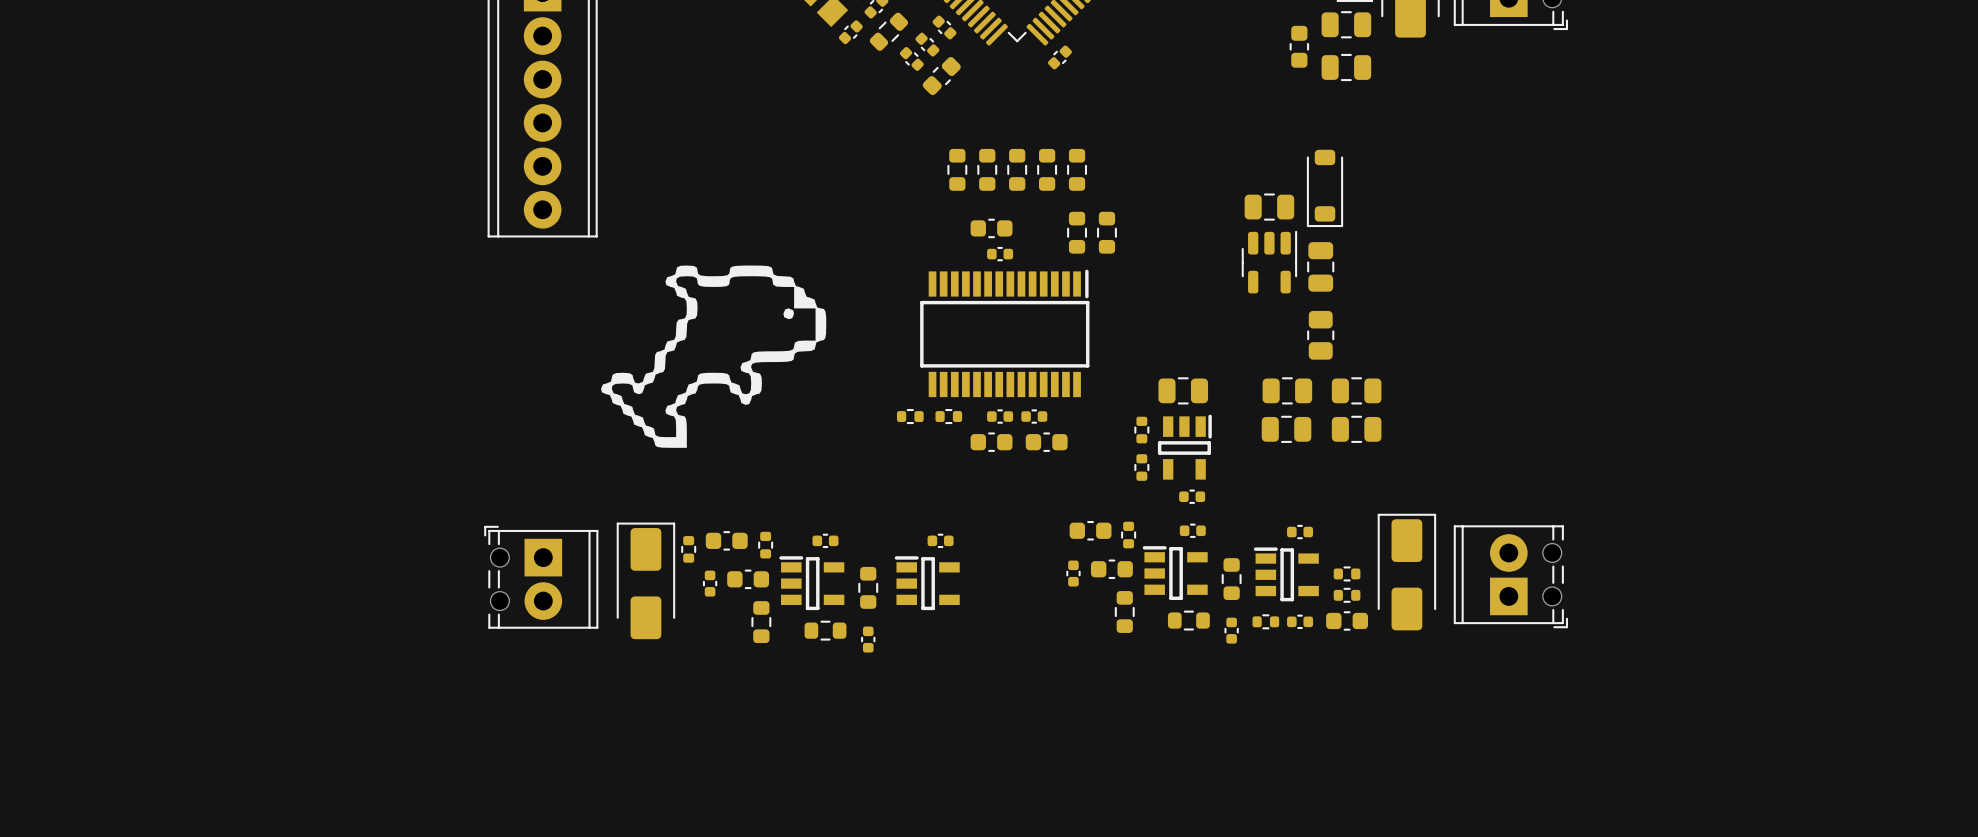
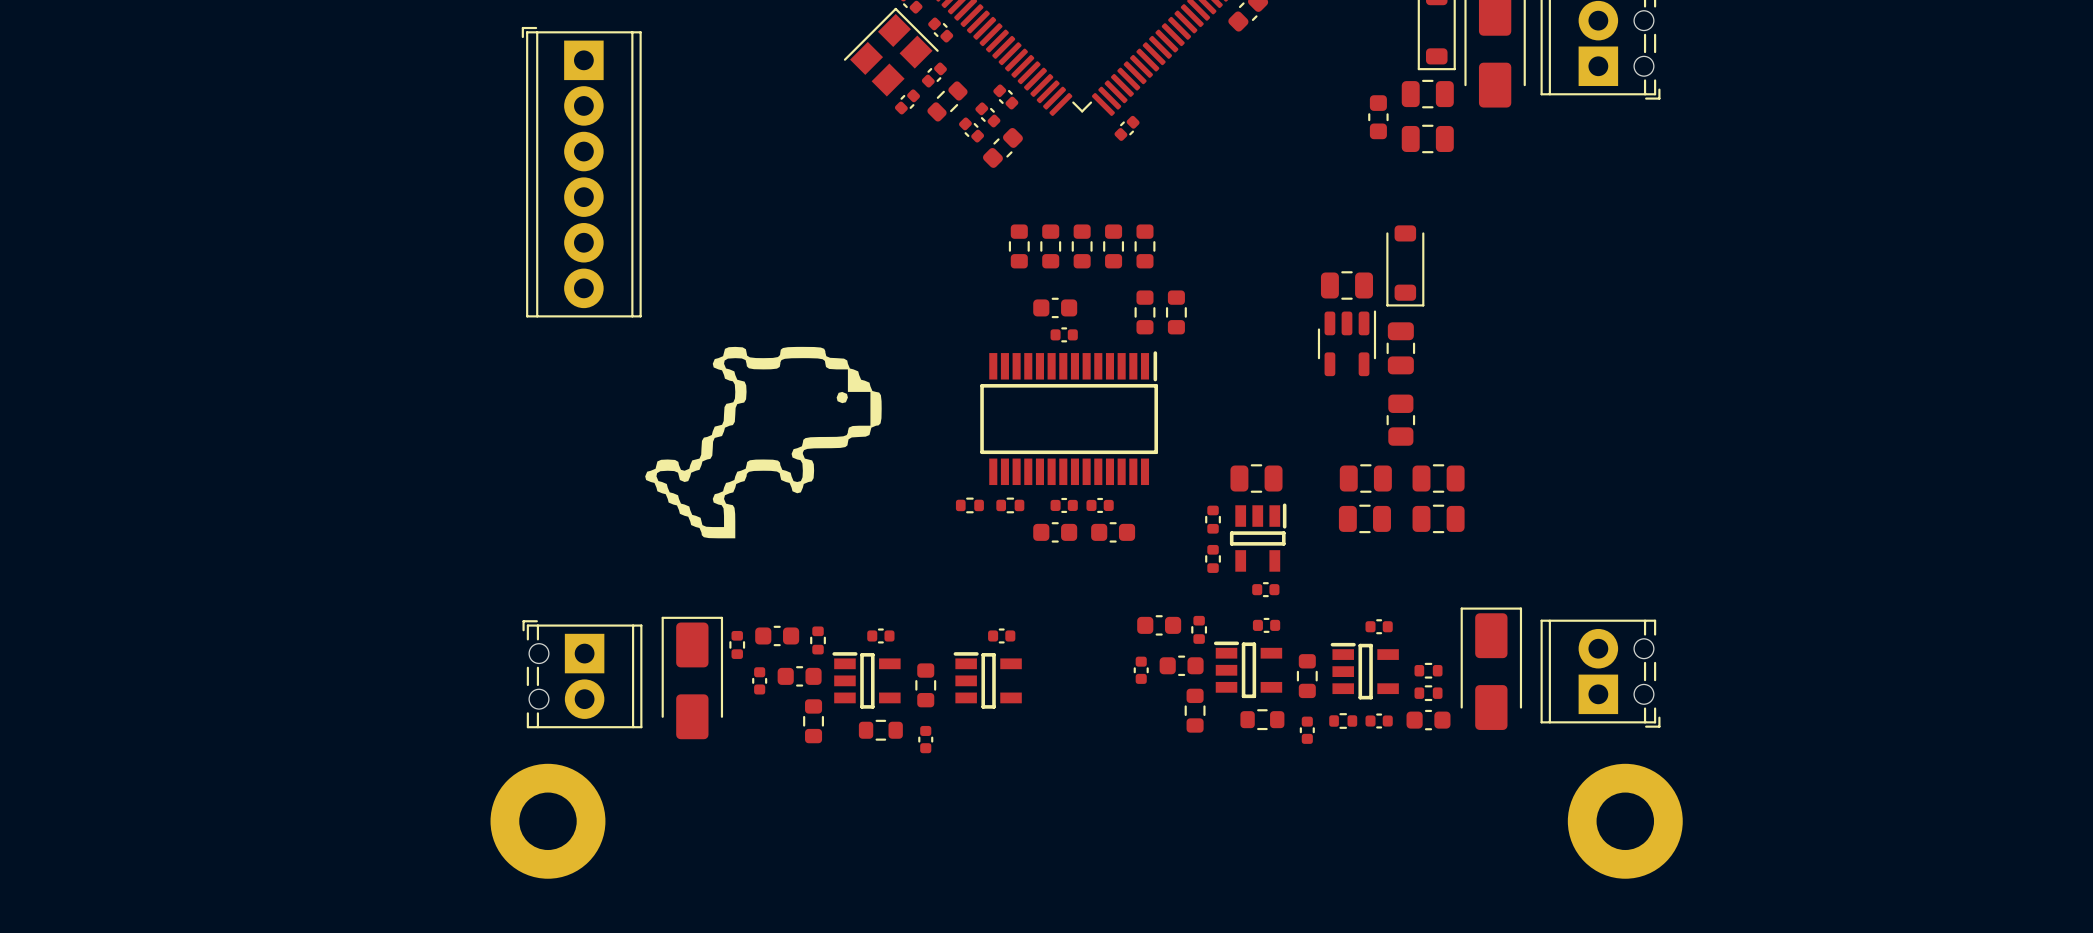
part: none -> (547, 821)
part: none -> (1625, 821)

